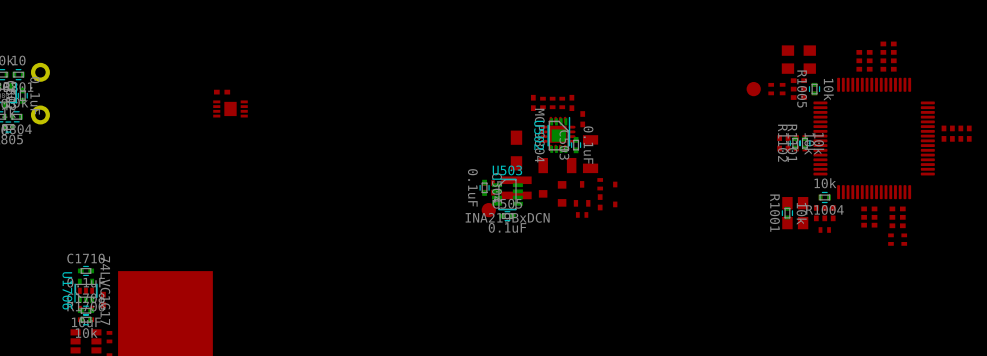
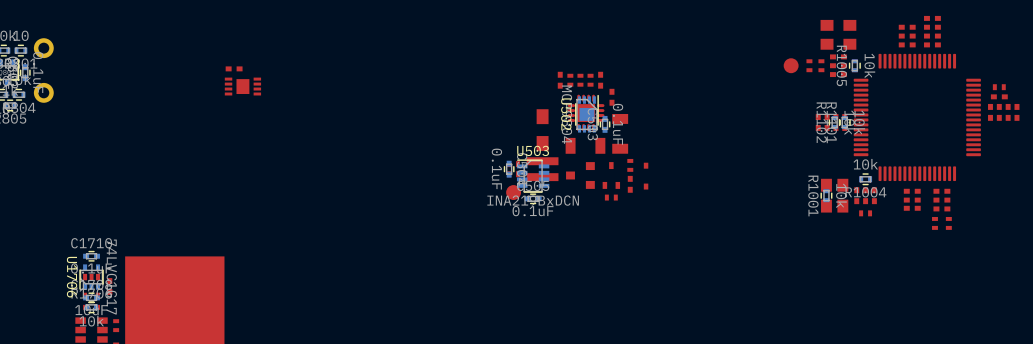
part: none -> (999, 87)
part: none -> (999, 96)

